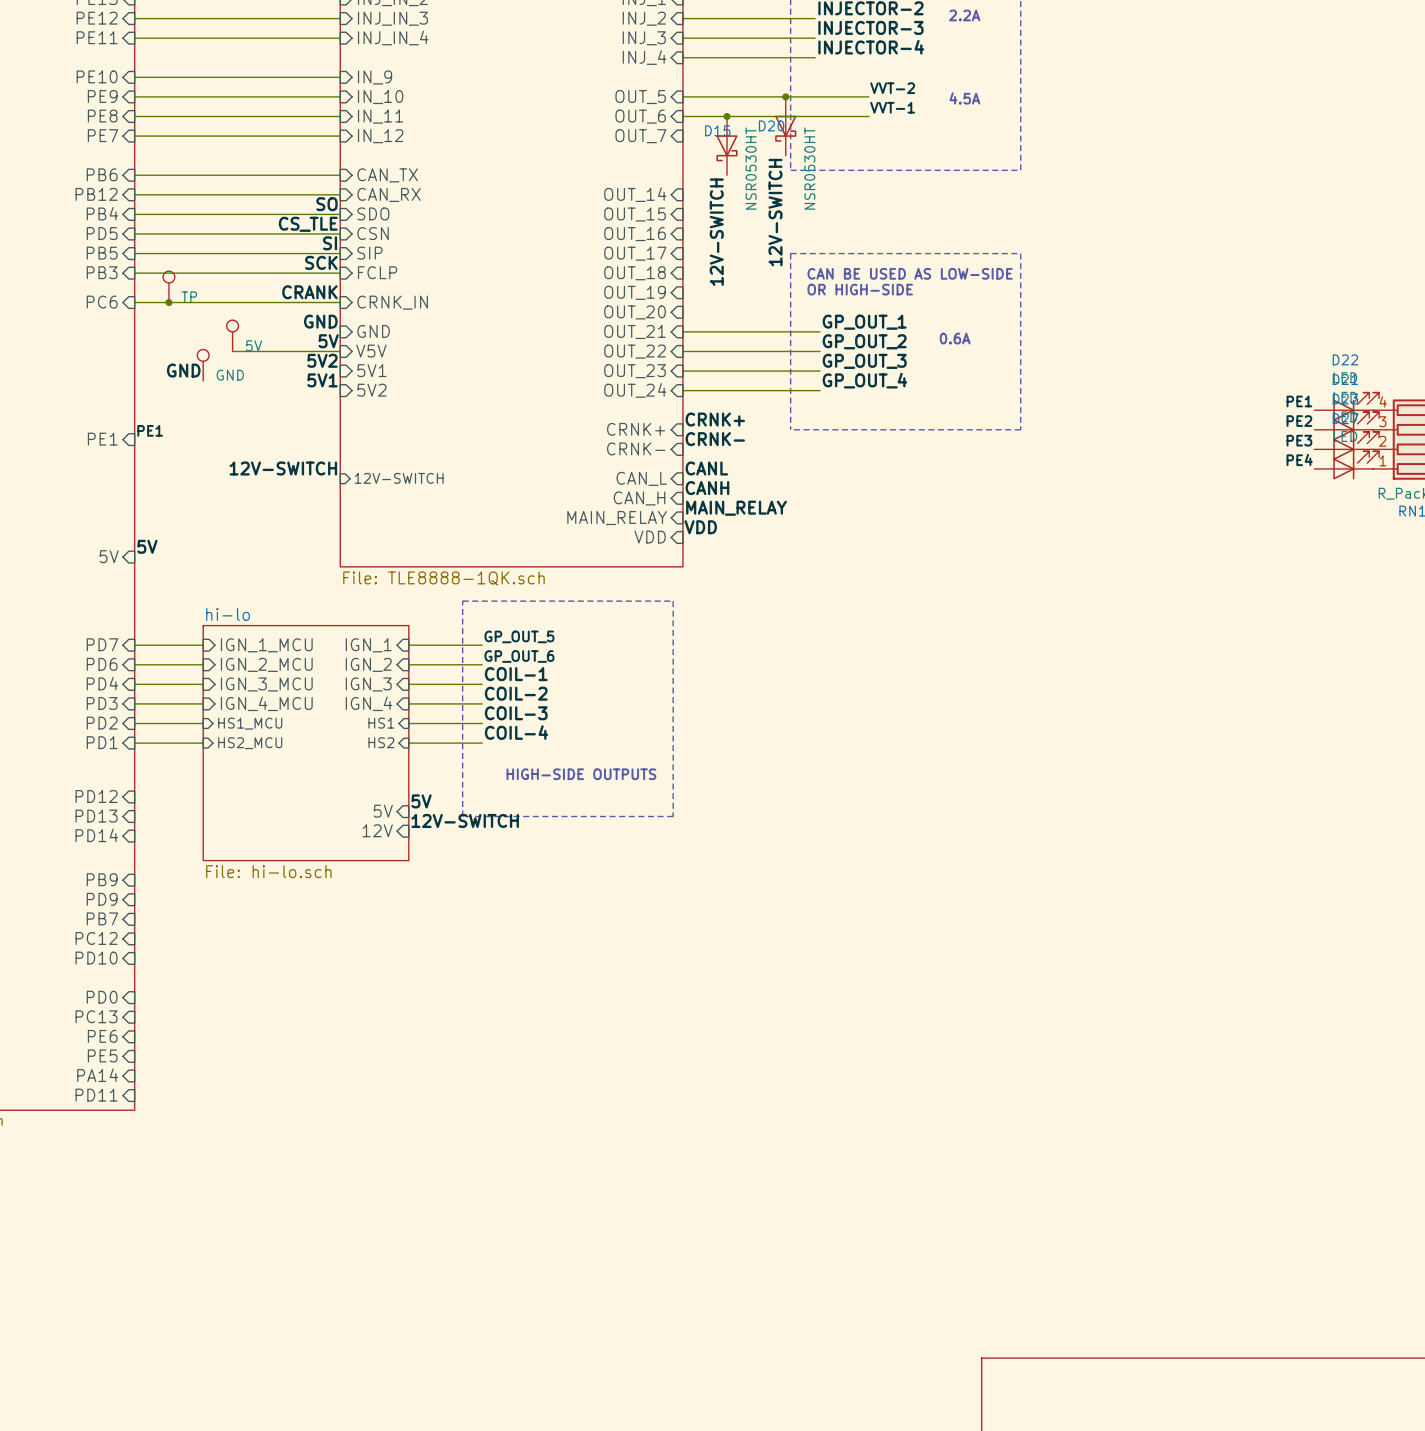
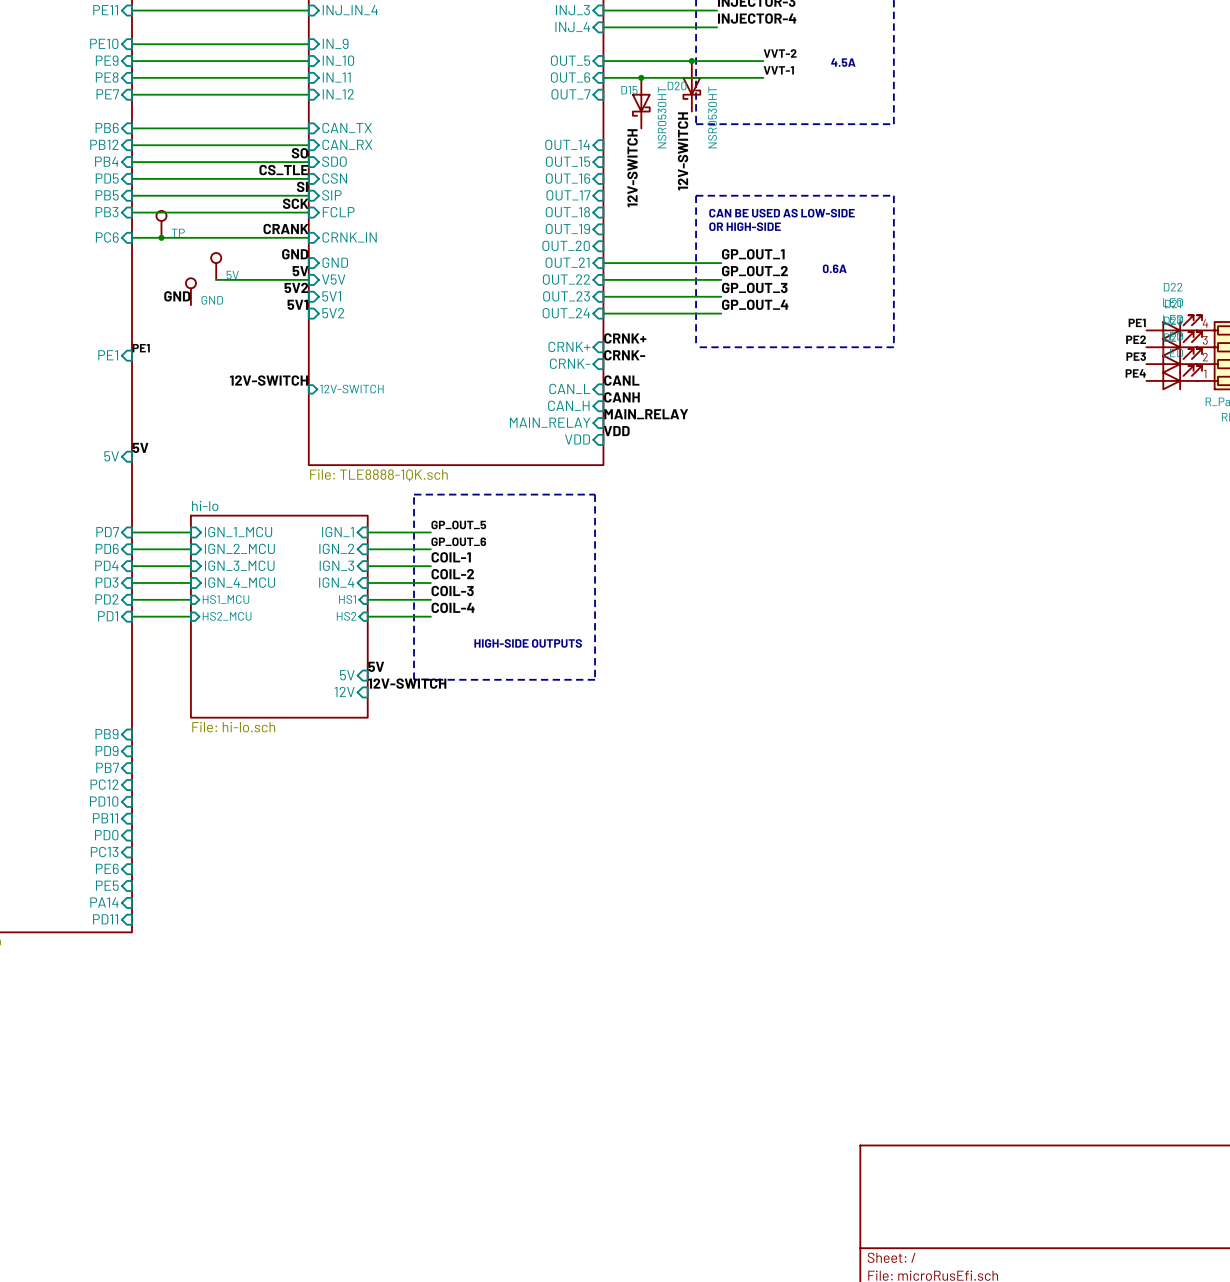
sheet pin: PD12 (96, 796) -> none
sheet pin: PD13 (96, 816) -> none
sheet pin: PD14 (96, 835) -> none
sheet pin: none -> PB11 (105, 818)

